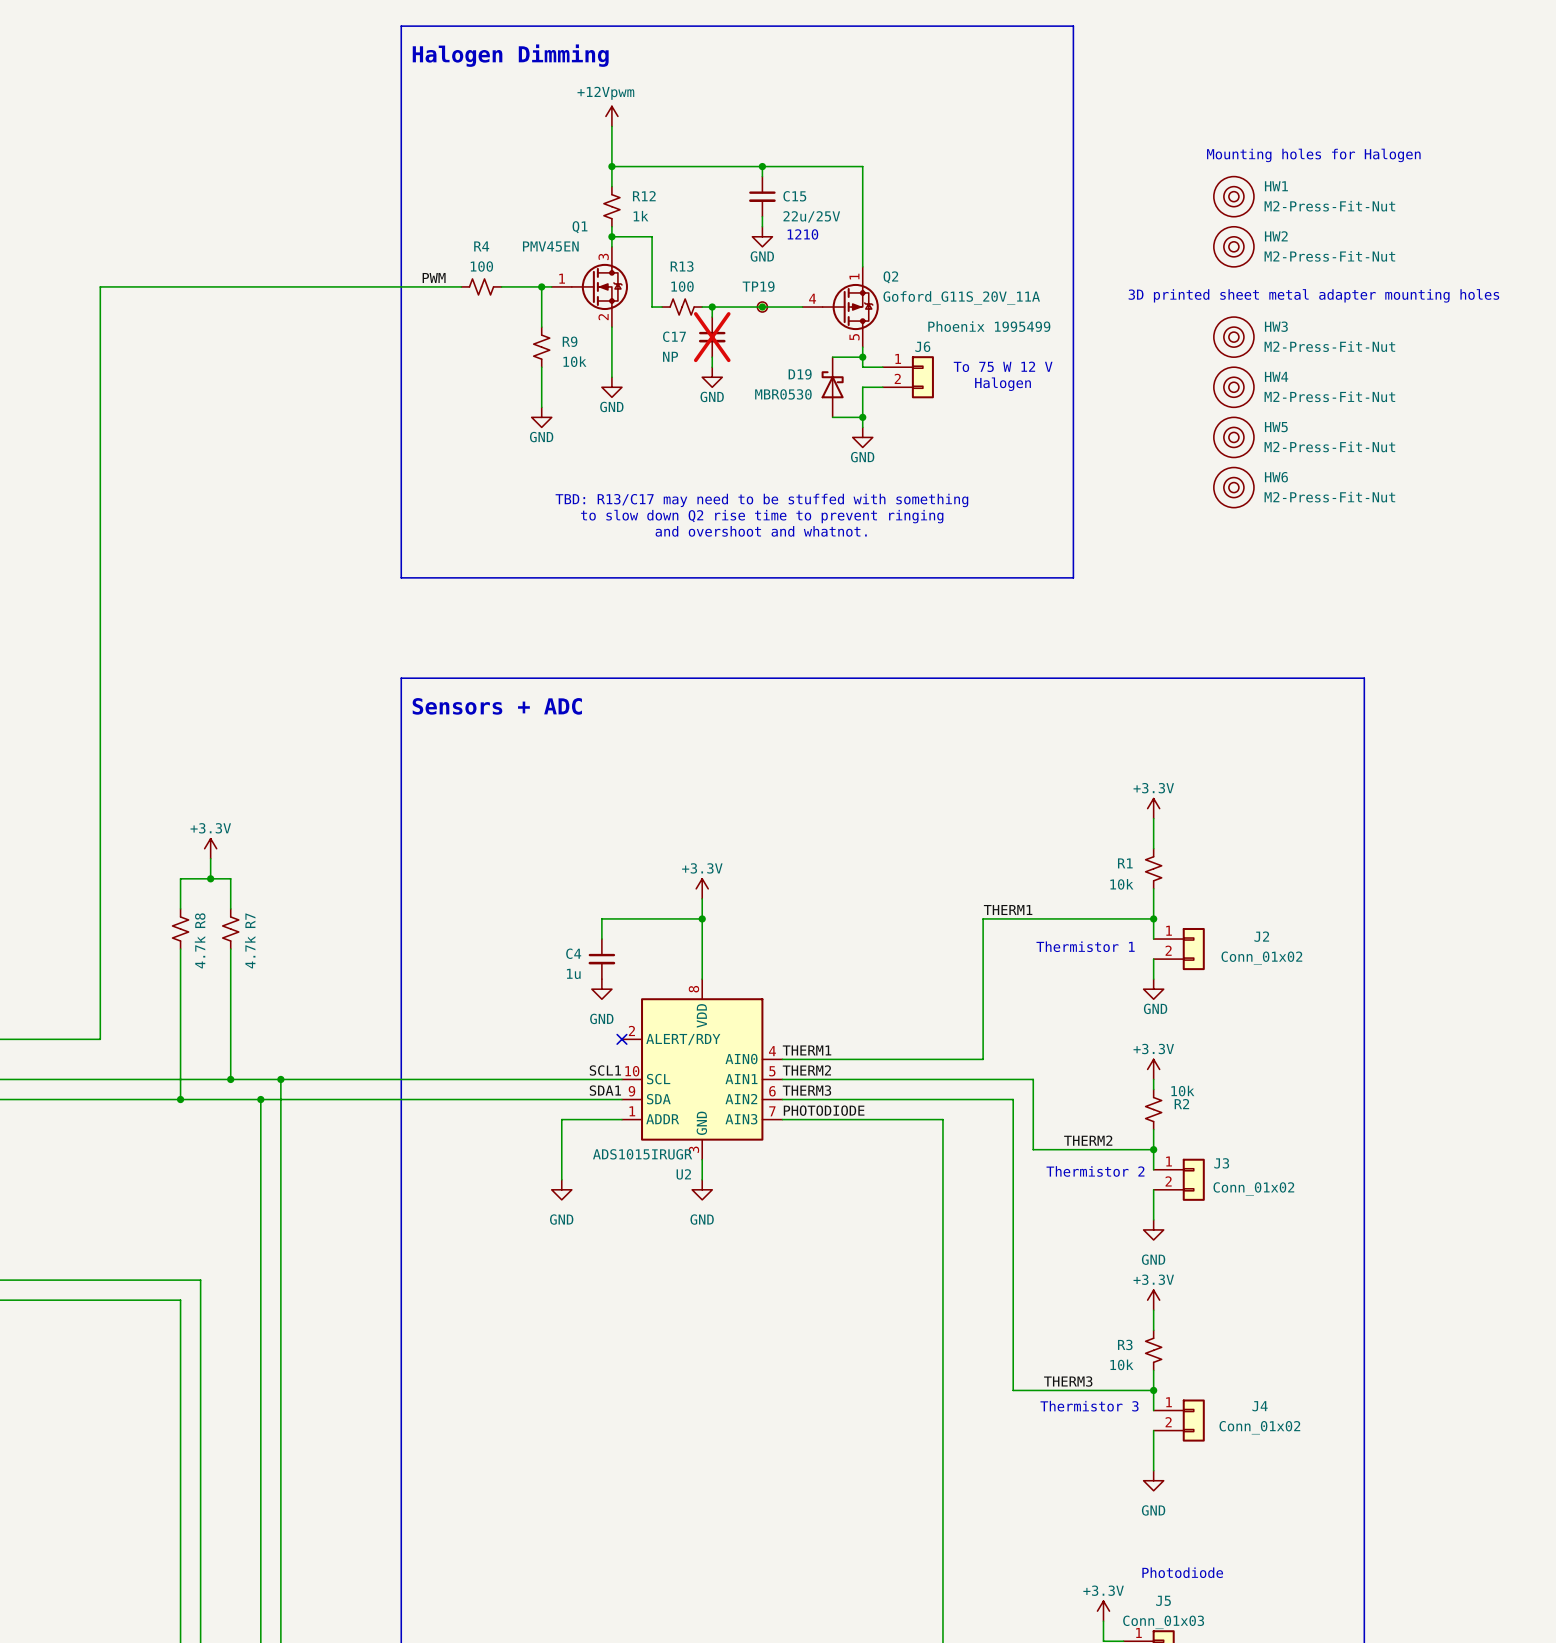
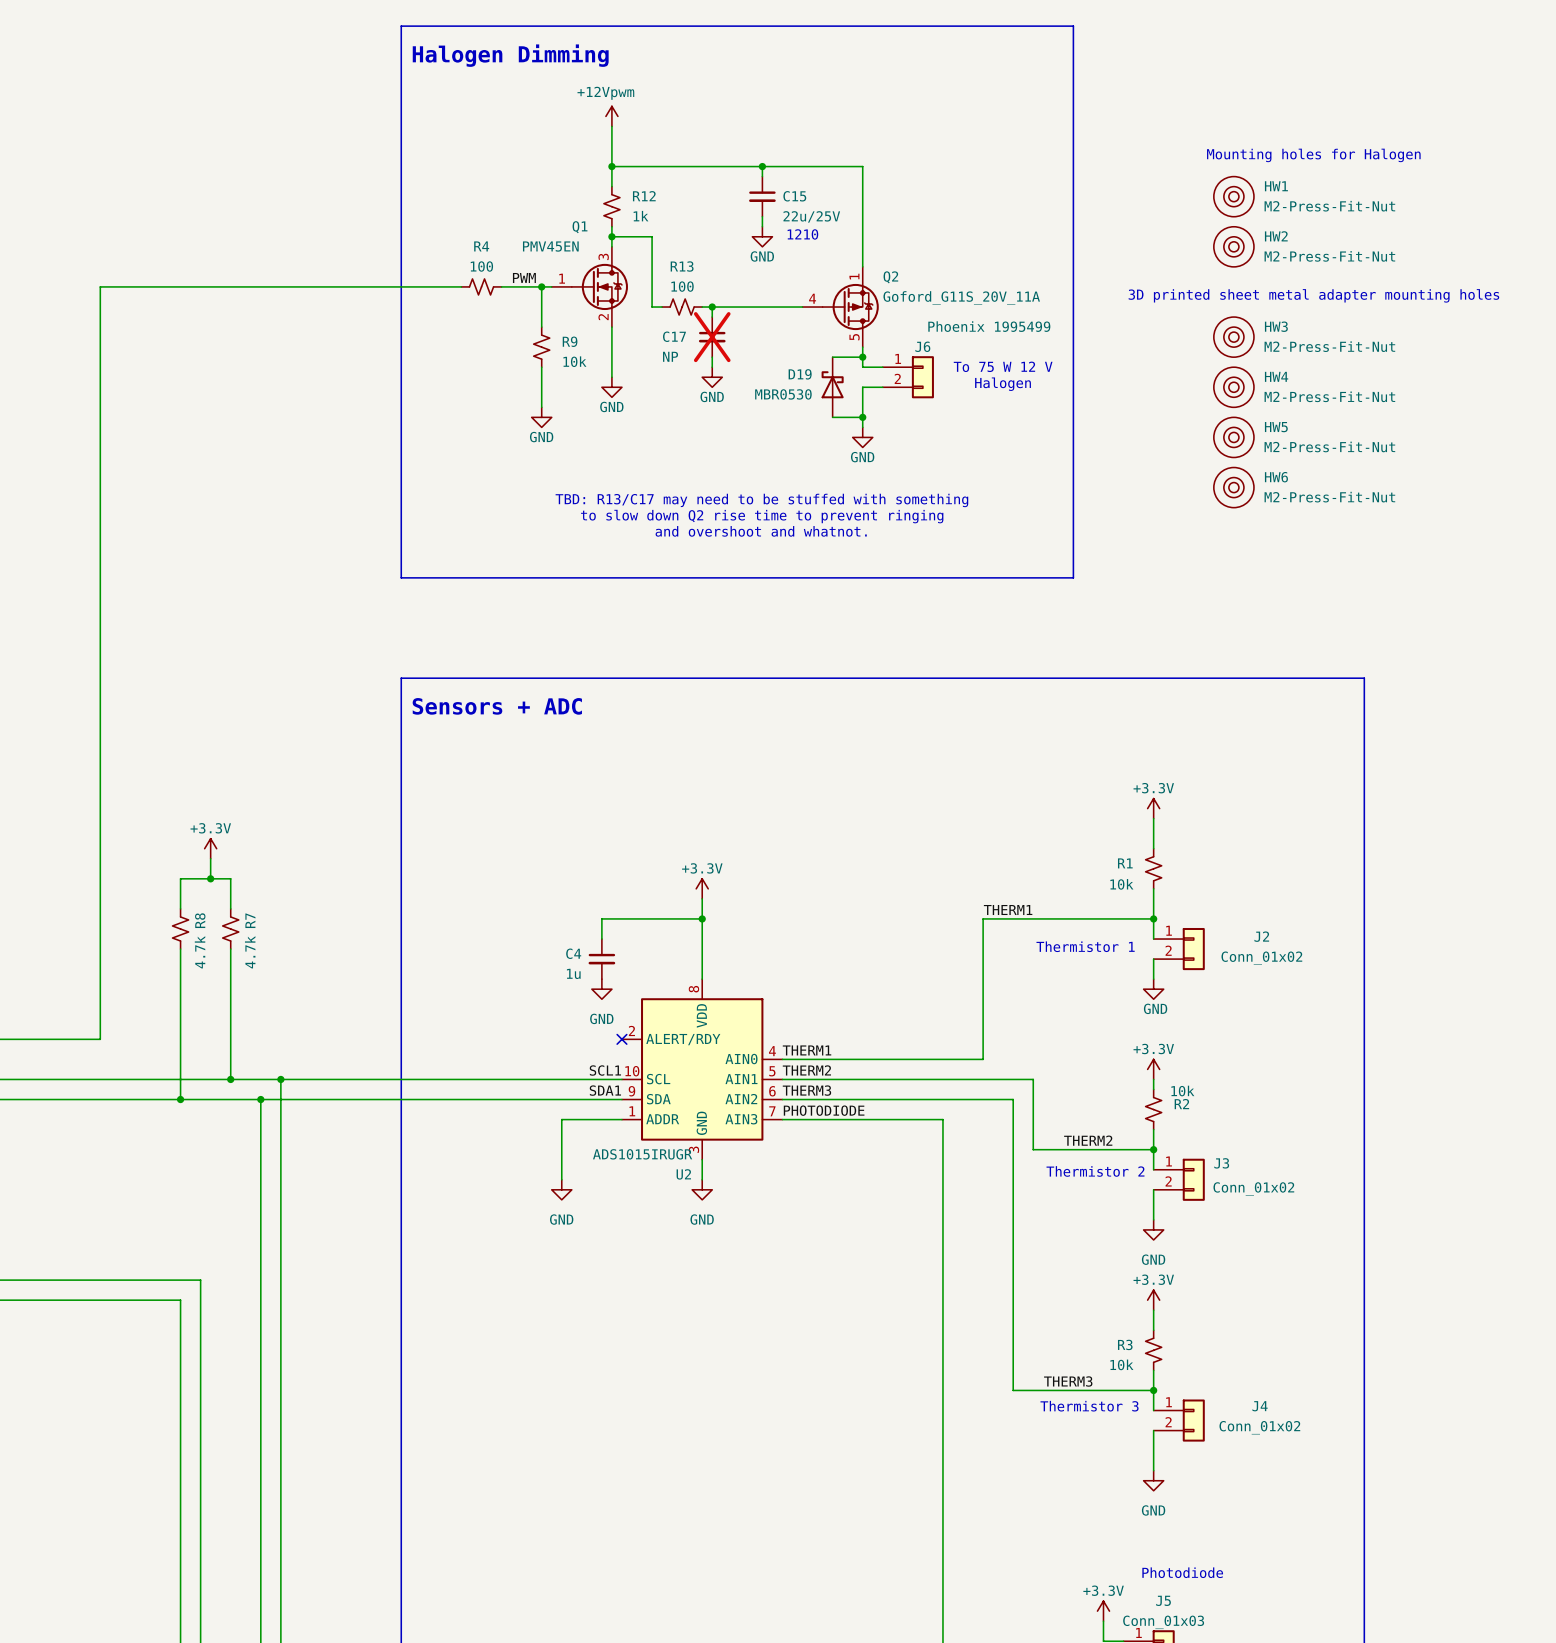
label position: PWM (434, 278) -> PWM (524, 278)
junction: (762, 307) -> none
TP19: (762, 307) -> none

